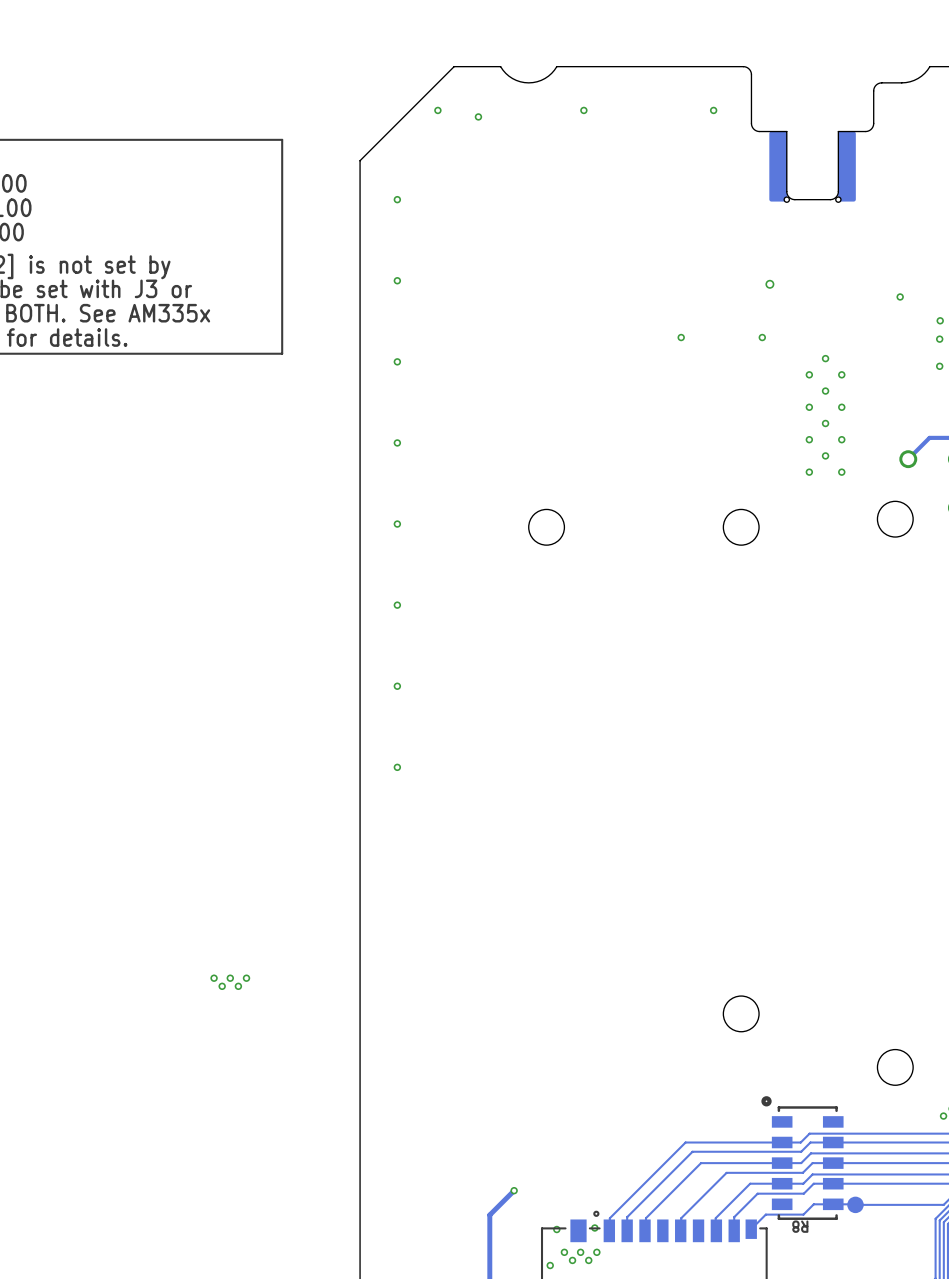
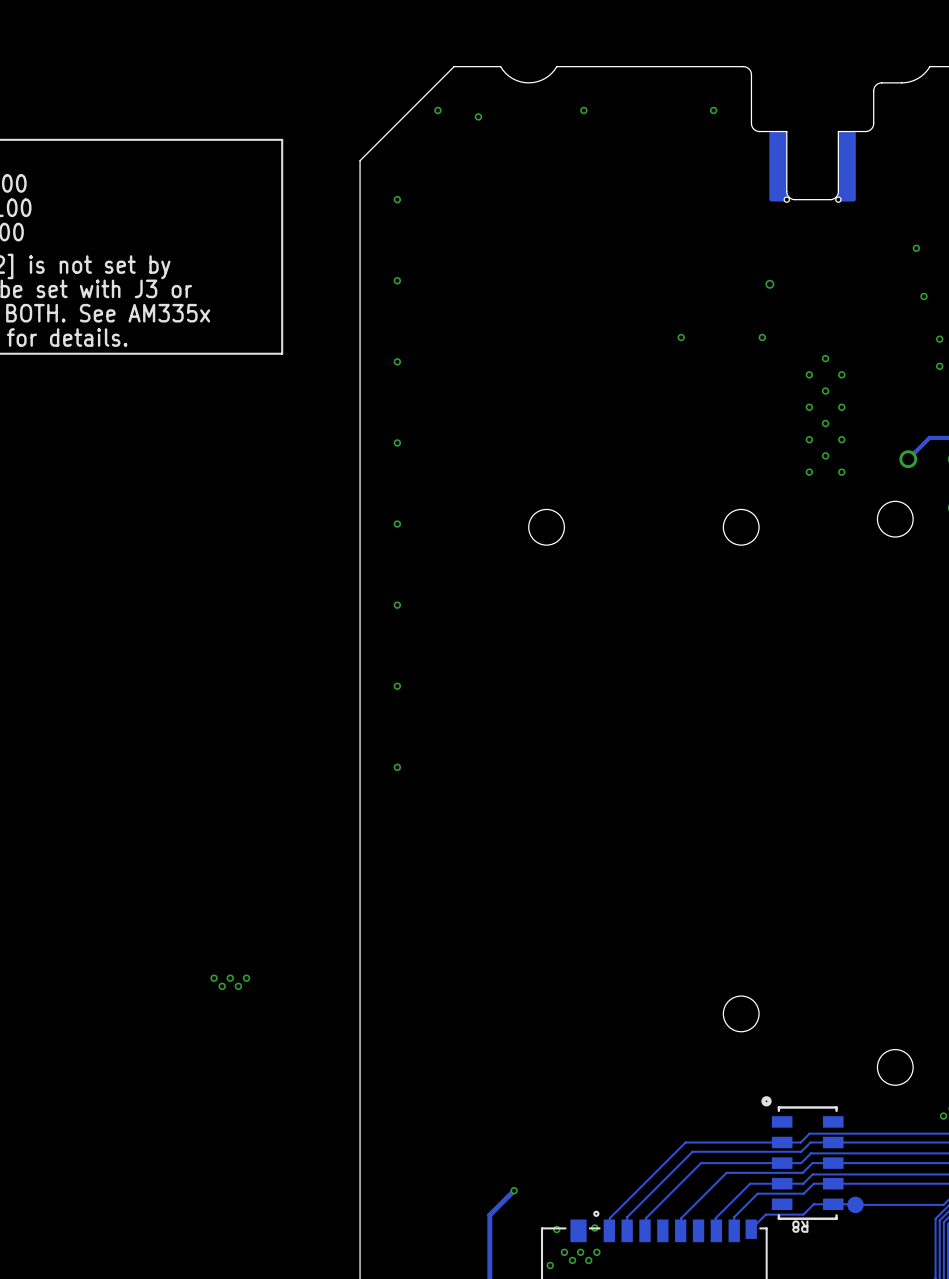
via: none -> (916, 248)
via: (900, 296) -> none
via: none -> (923, 296)
via: (940, 320) -> none

